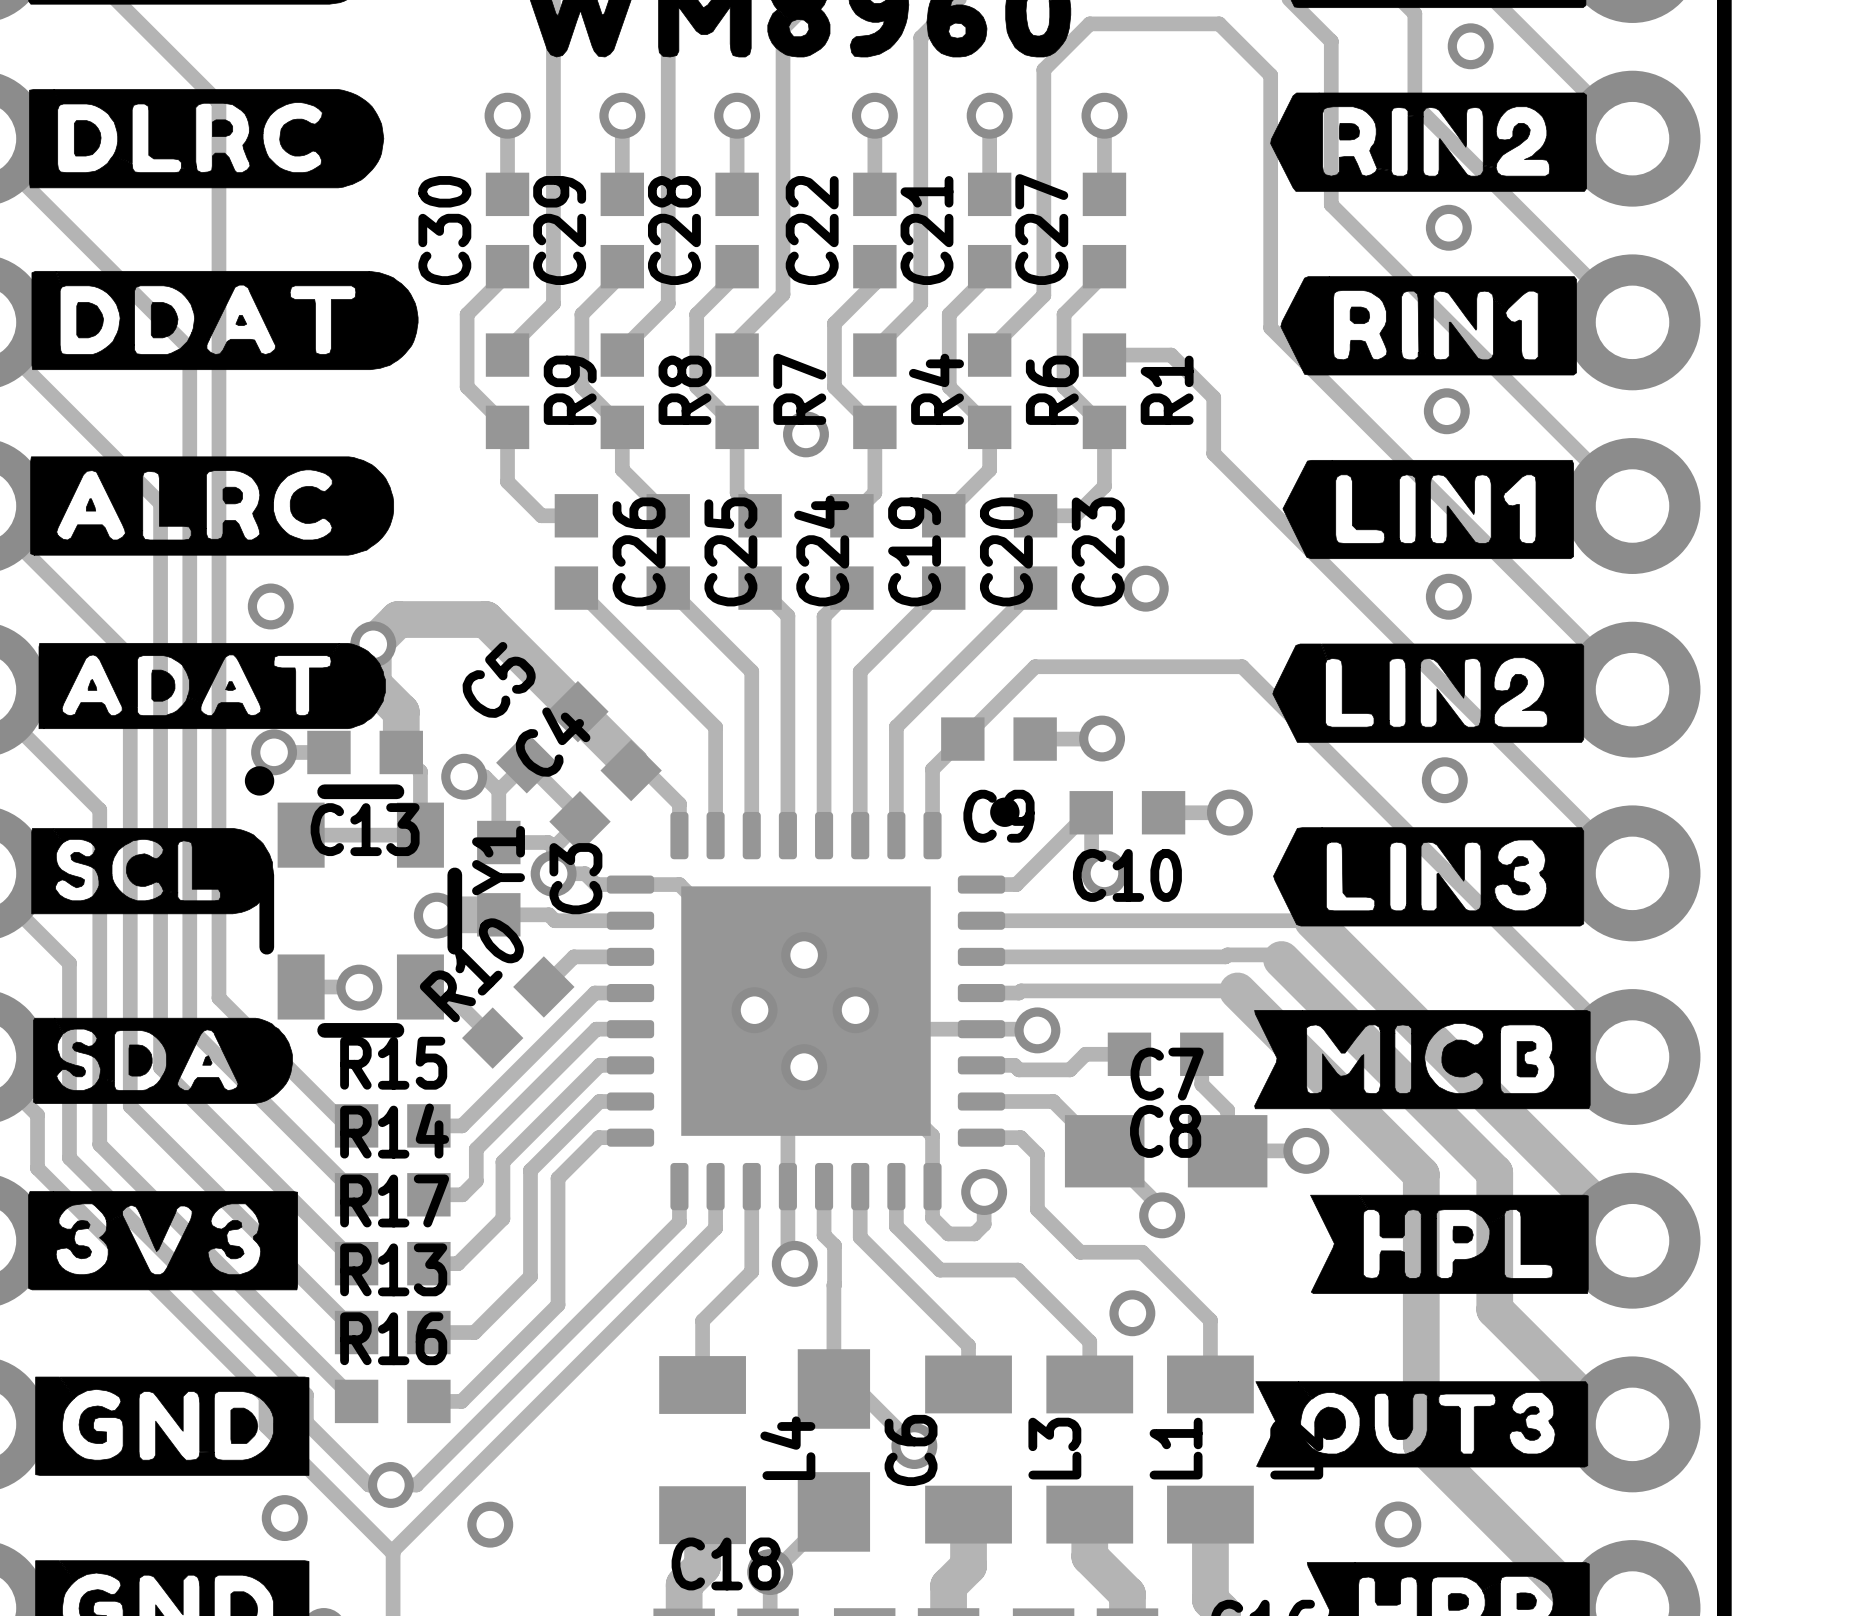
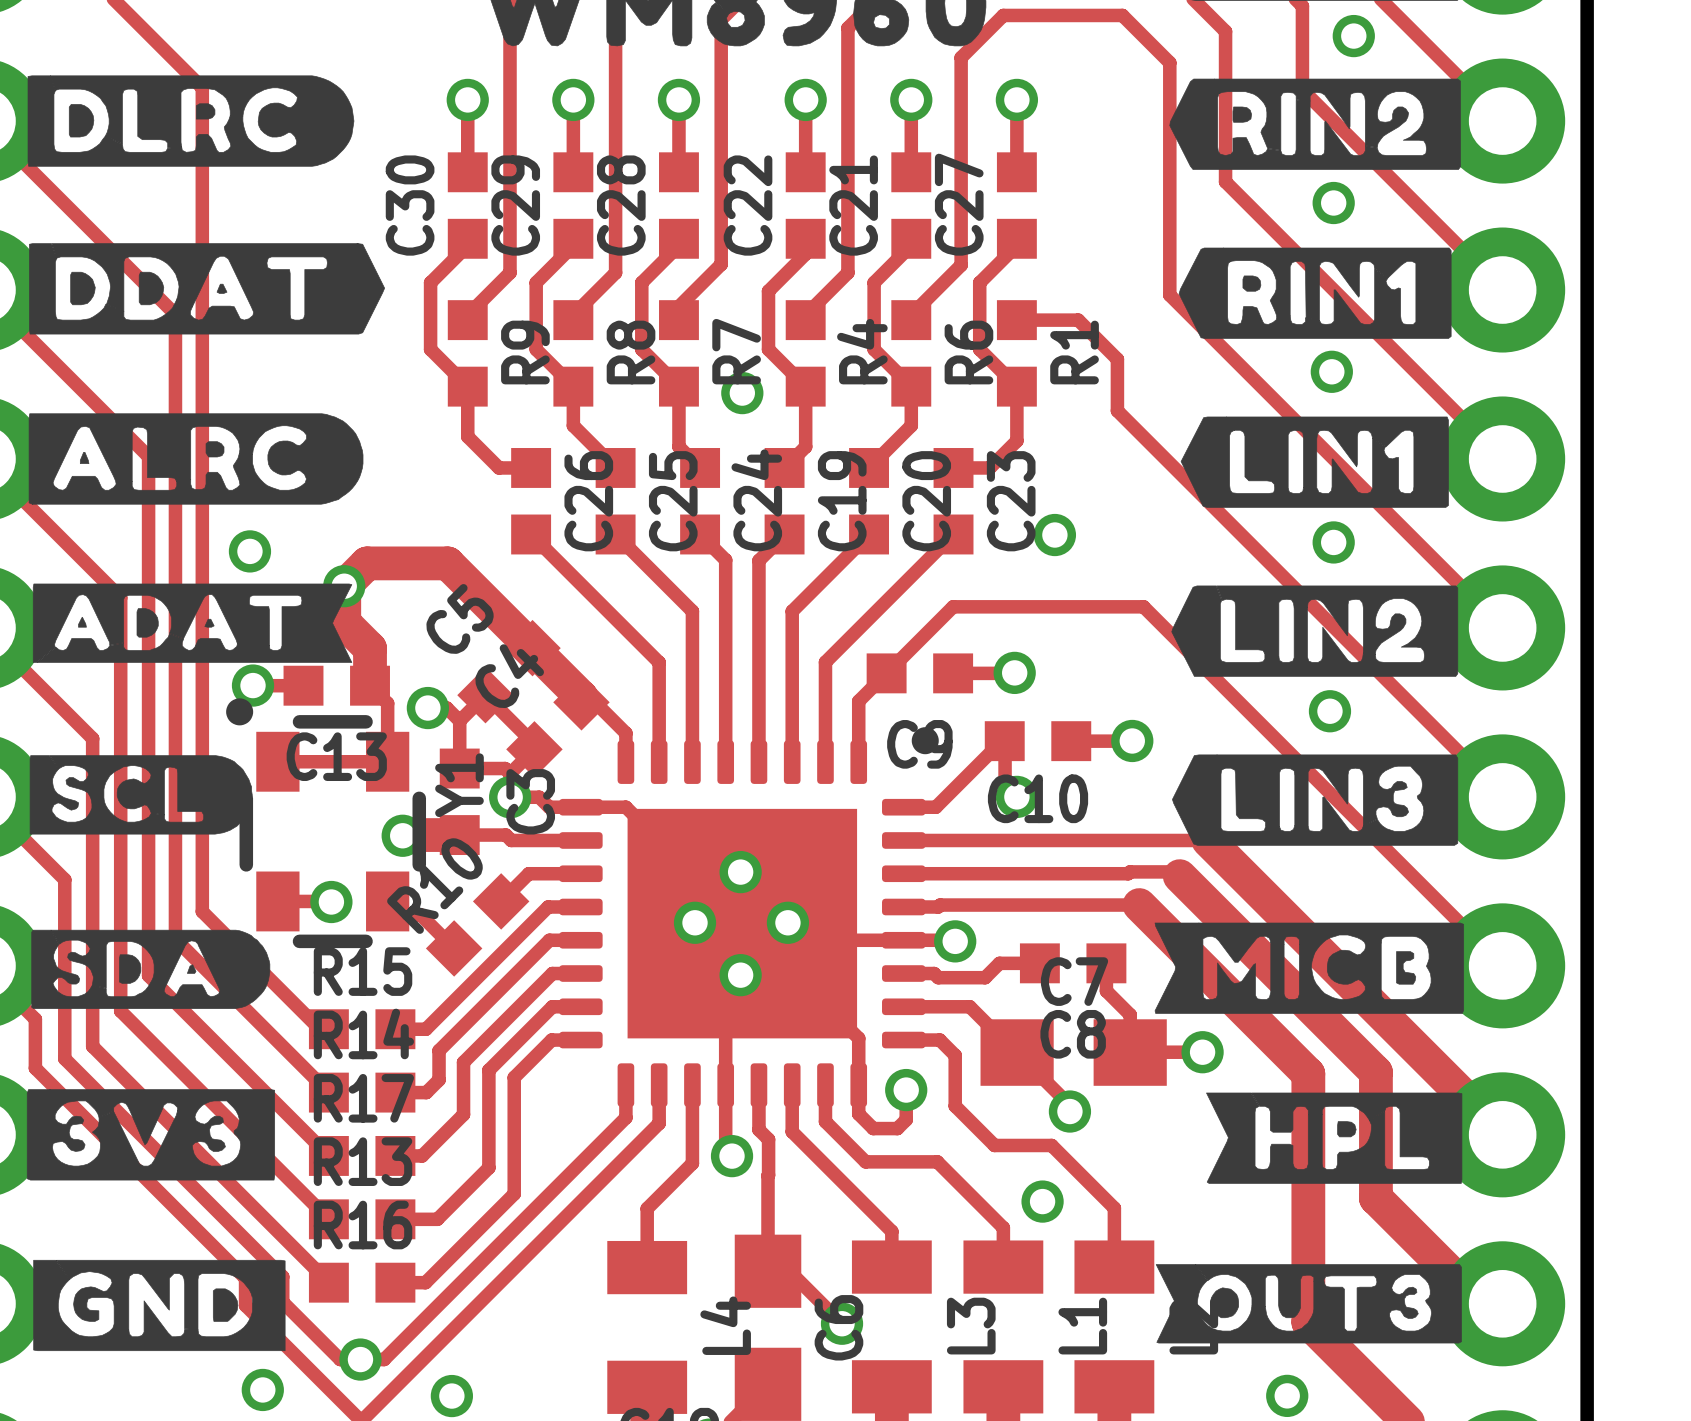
drawing shape: [31, 270, 419, 371] -> [29, 243, 385, 335]
drawing shape: [38, 642, 386, 730] -> [32, 583, 353, 663]

